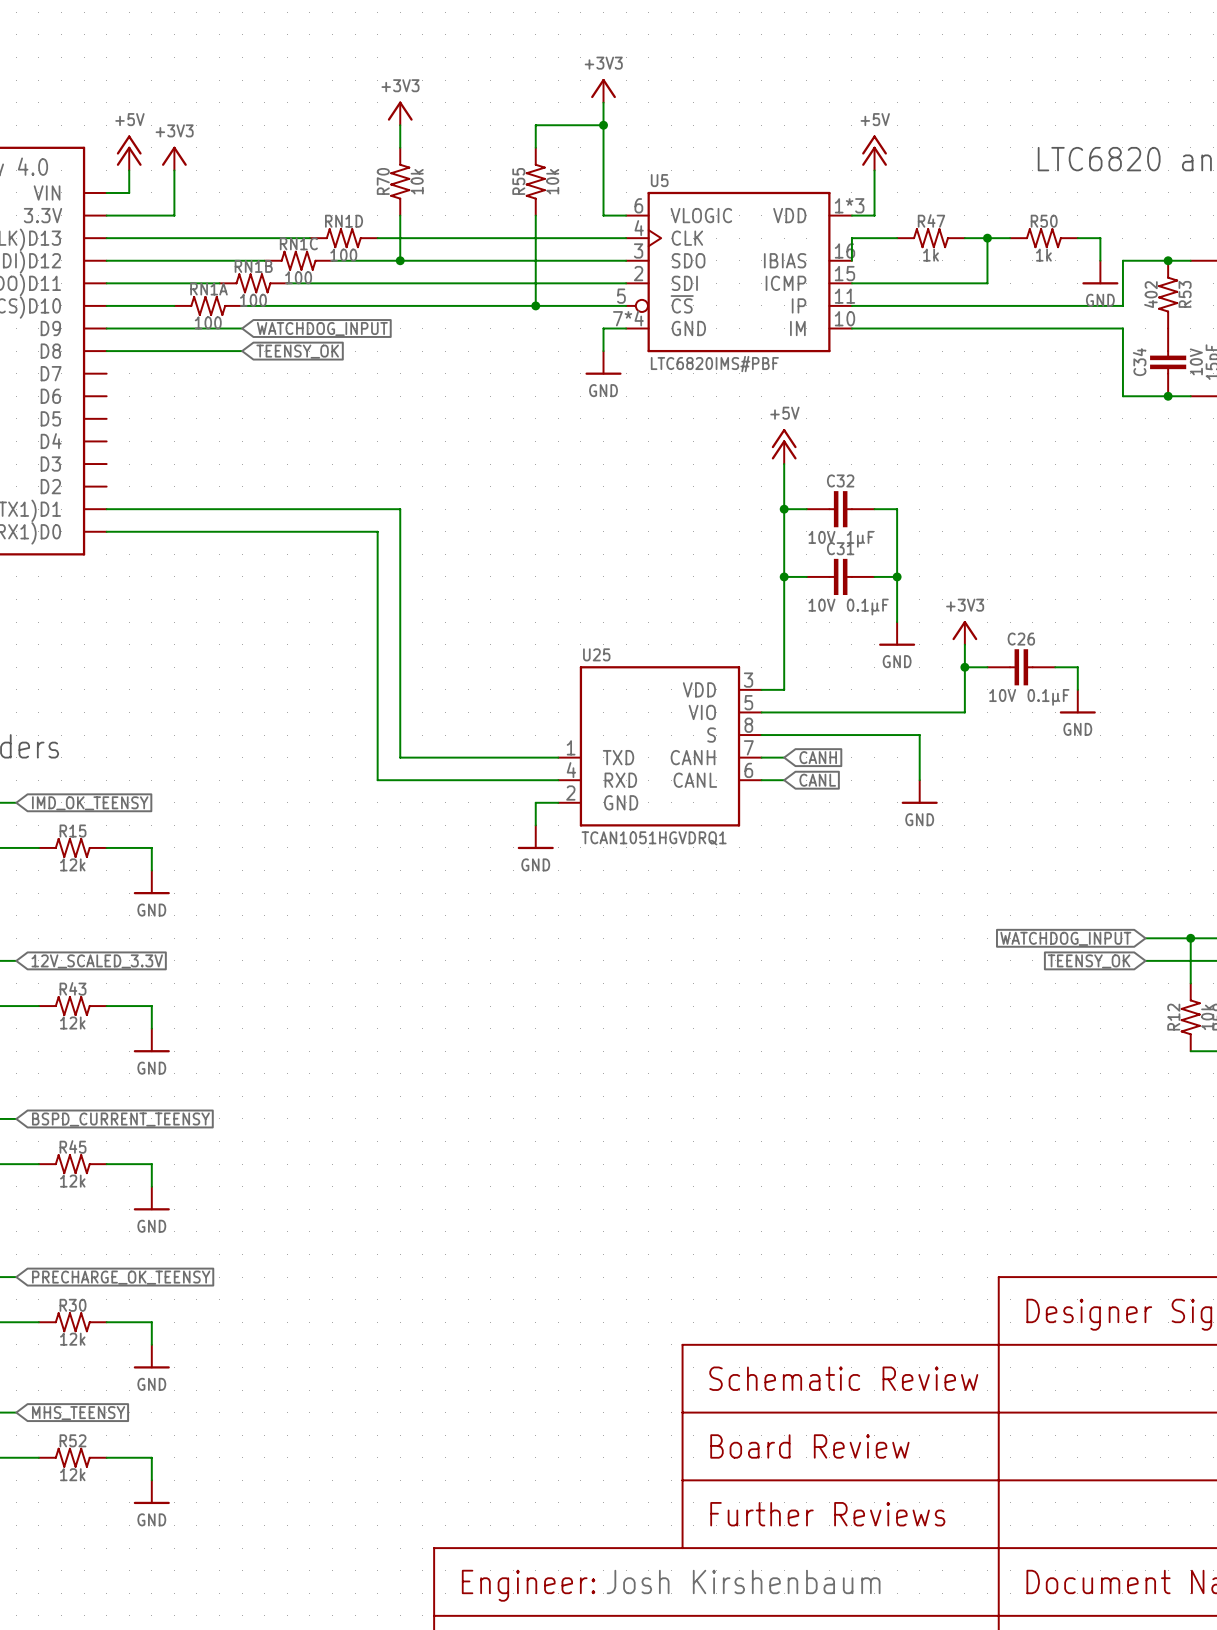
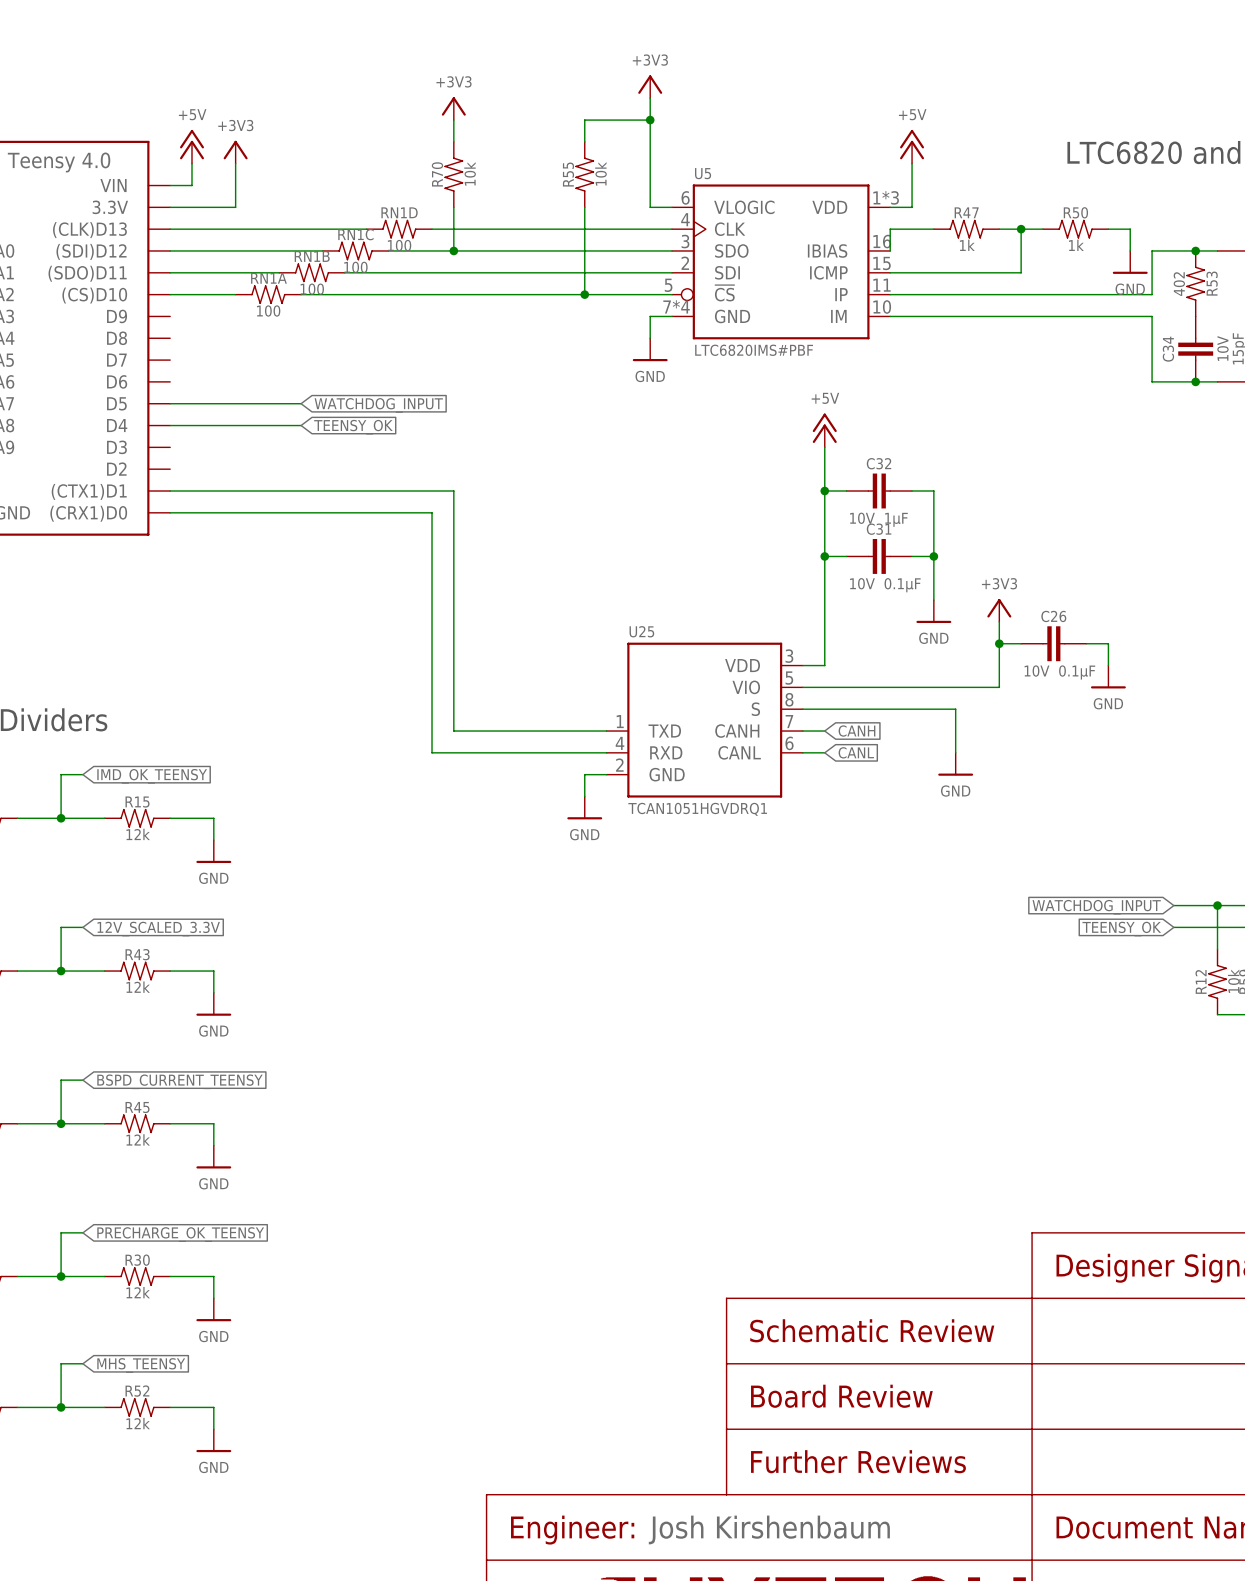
wire: (106, 328) (242, 328) -> (170, 425) (301, 425)
global label position: WATCHDOG_INPUT (322, 329) -> WATCHDOG_INPUT (378, 405)
wire: (106, 351) (242, 351) -> (170, 403) (301, 403)
global label position: TEENSY_OK (297, 351) -> TEENSY_OK (353, 427)

